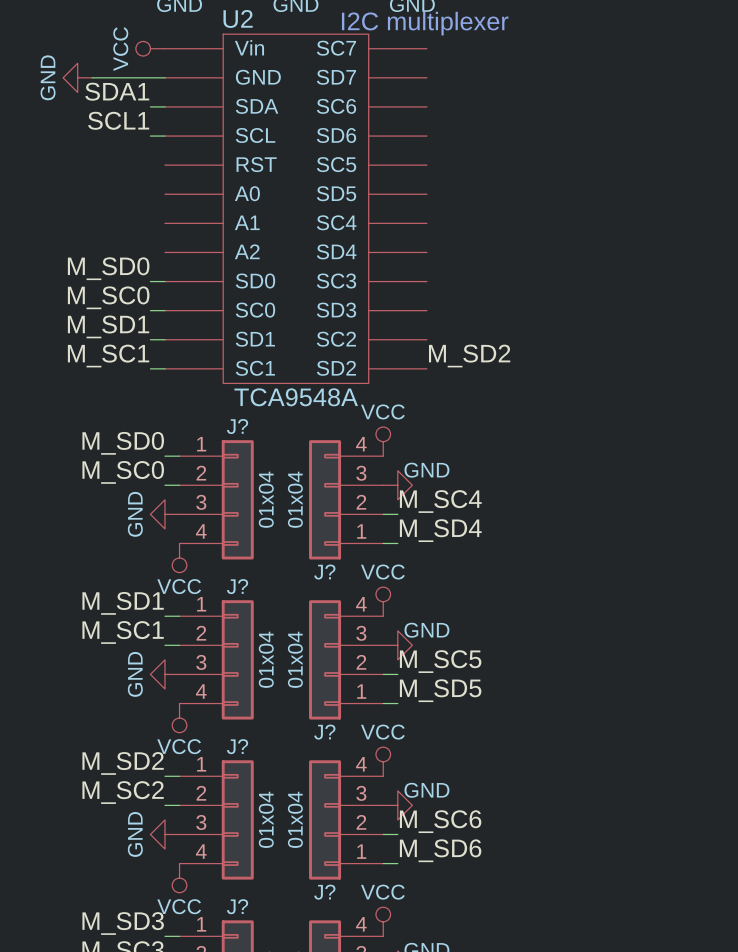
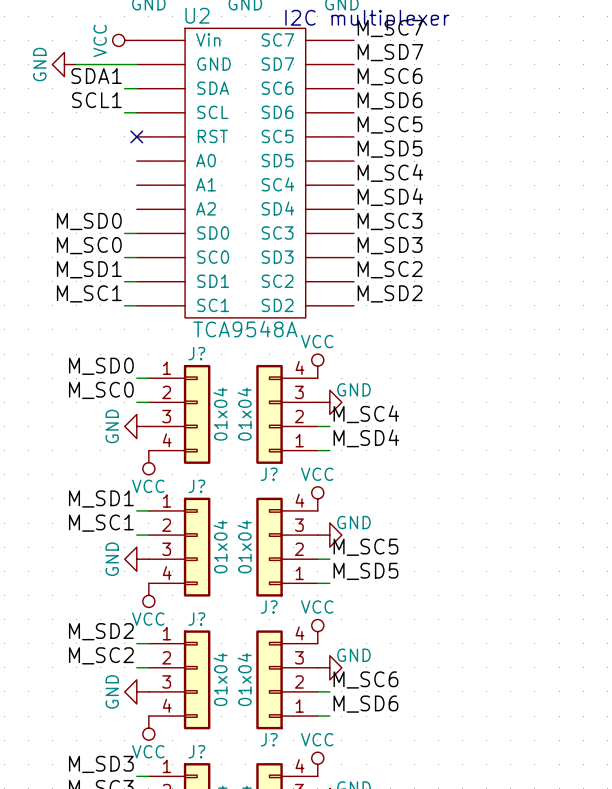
label: none -> M_SC7 (390, 28)
label: none -> M_SD7 (390, 52)
label: none -> M_SC6 (390, 76)
label: none -> M_SD6 (390, 100)
label: none -> M_SC5 (390, 124)
no-connect mark: none -> (136, 136)
label: none -> M_SD5 (390, 149)
label: none -> M_SC4 (390, 172)
label: none -> M_SD4 (390, 197)
label: none -> M_SC3 (390, 221)
label: none -> M_SD3 (390, 245)
label: none -> M_SC2 (390, 269)

